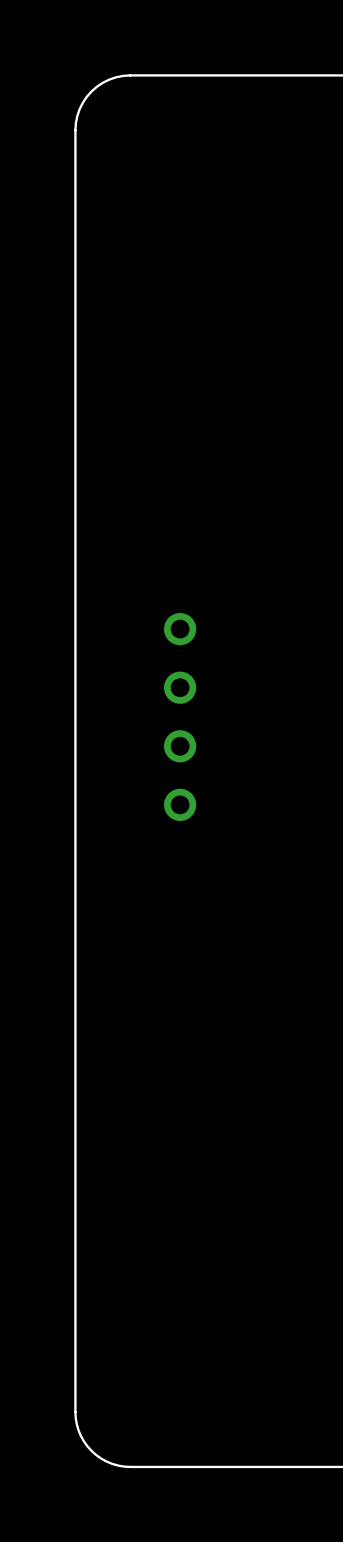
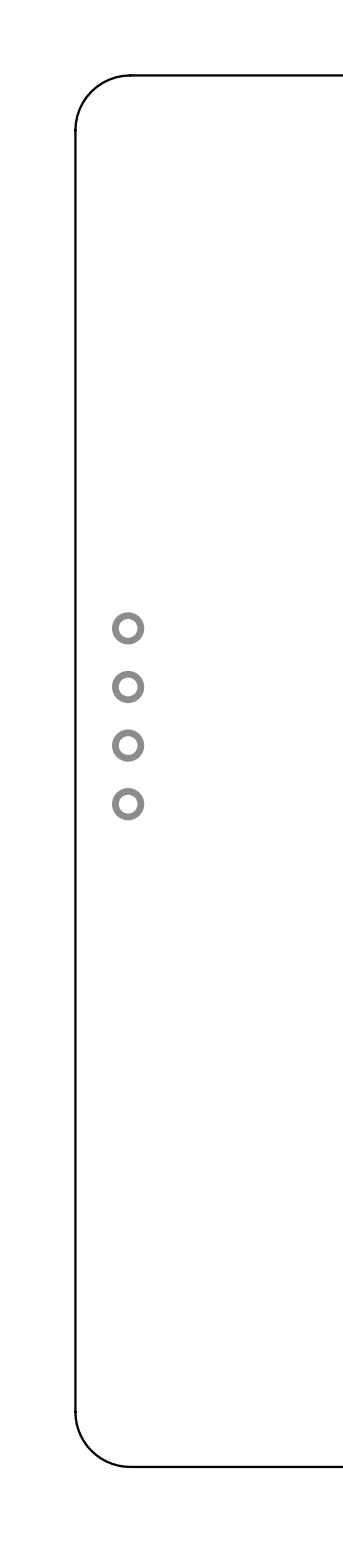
part position: (180, 716) -> (128, 716)

